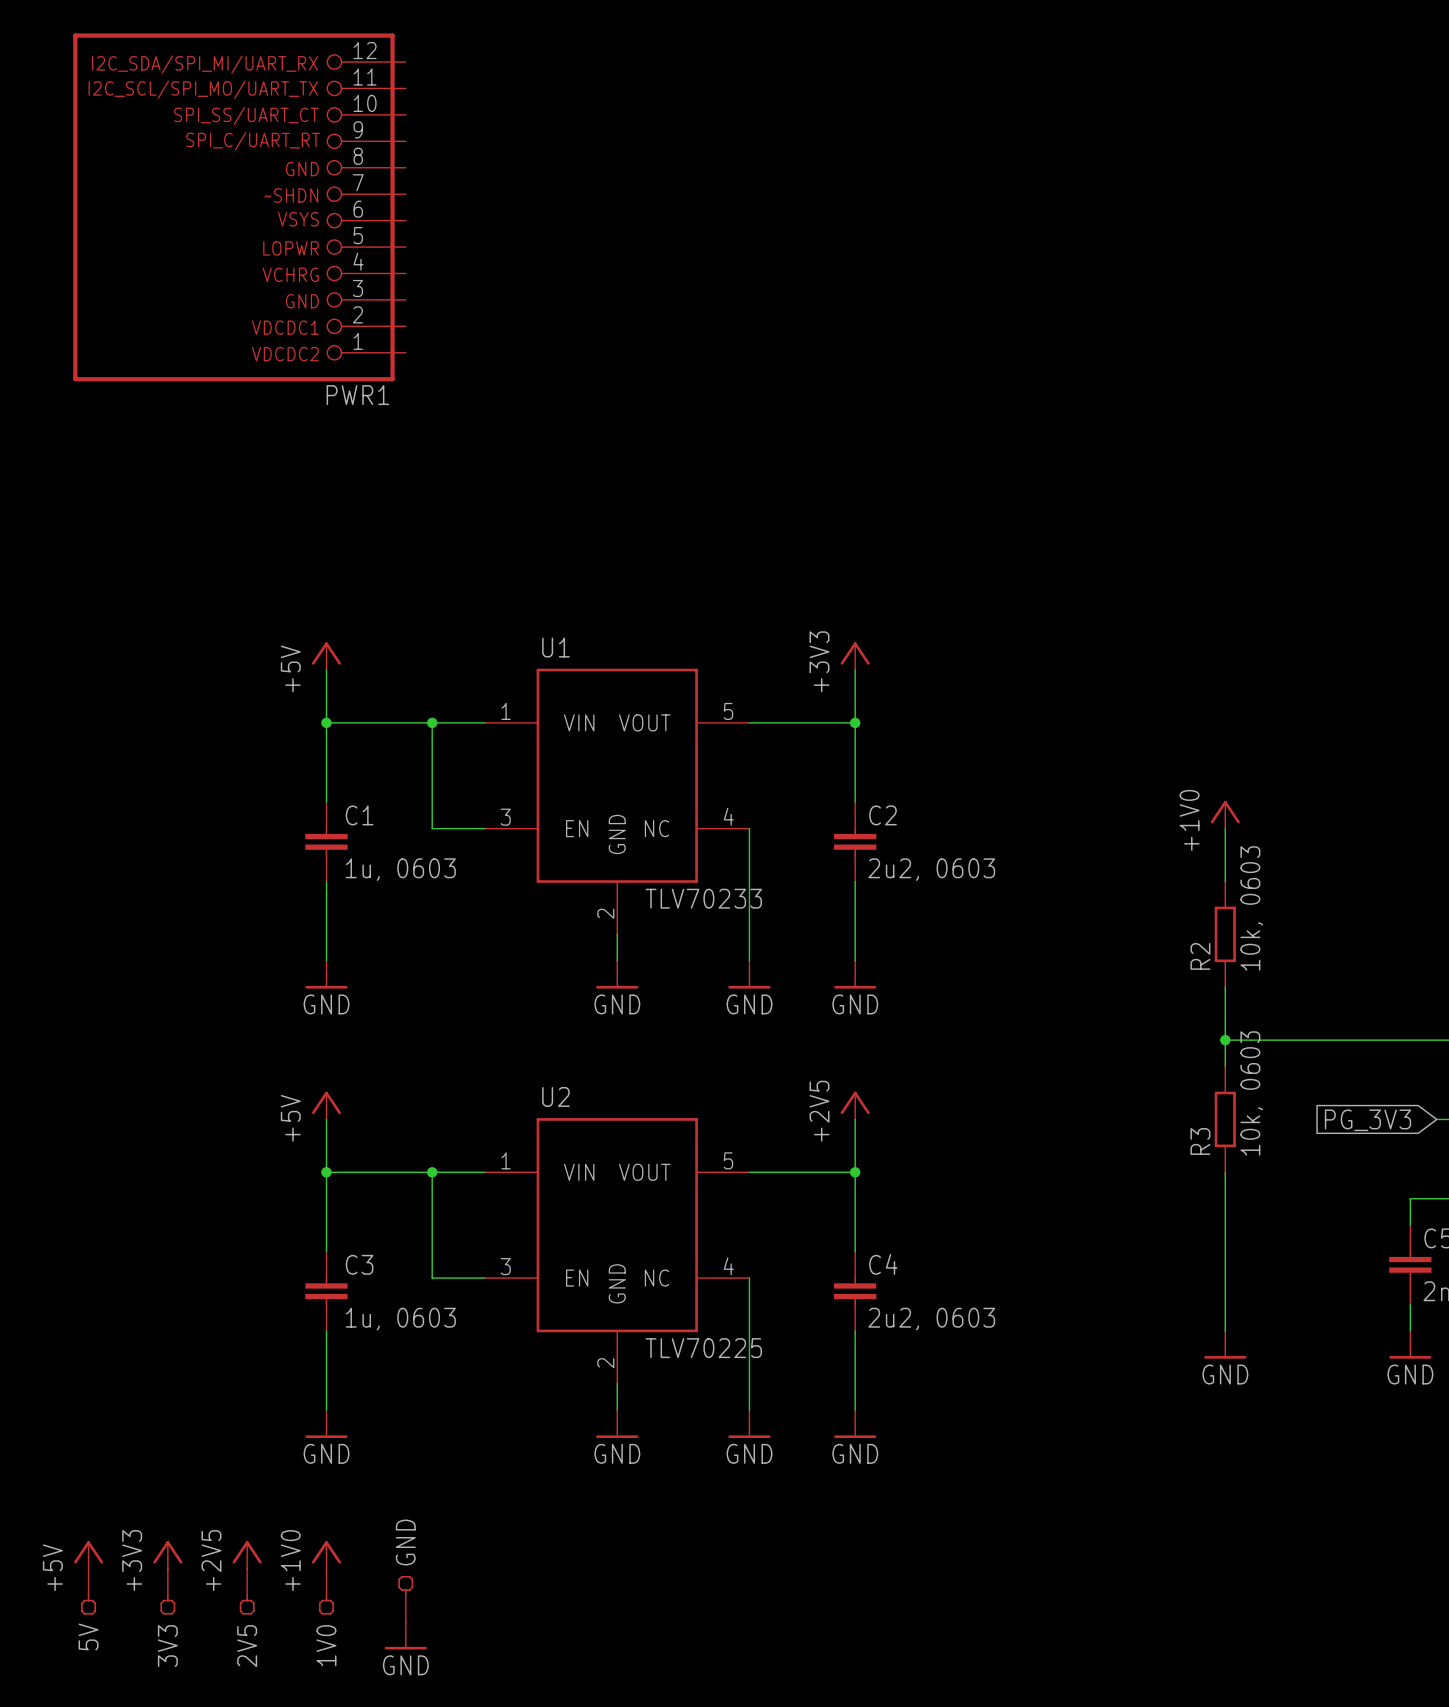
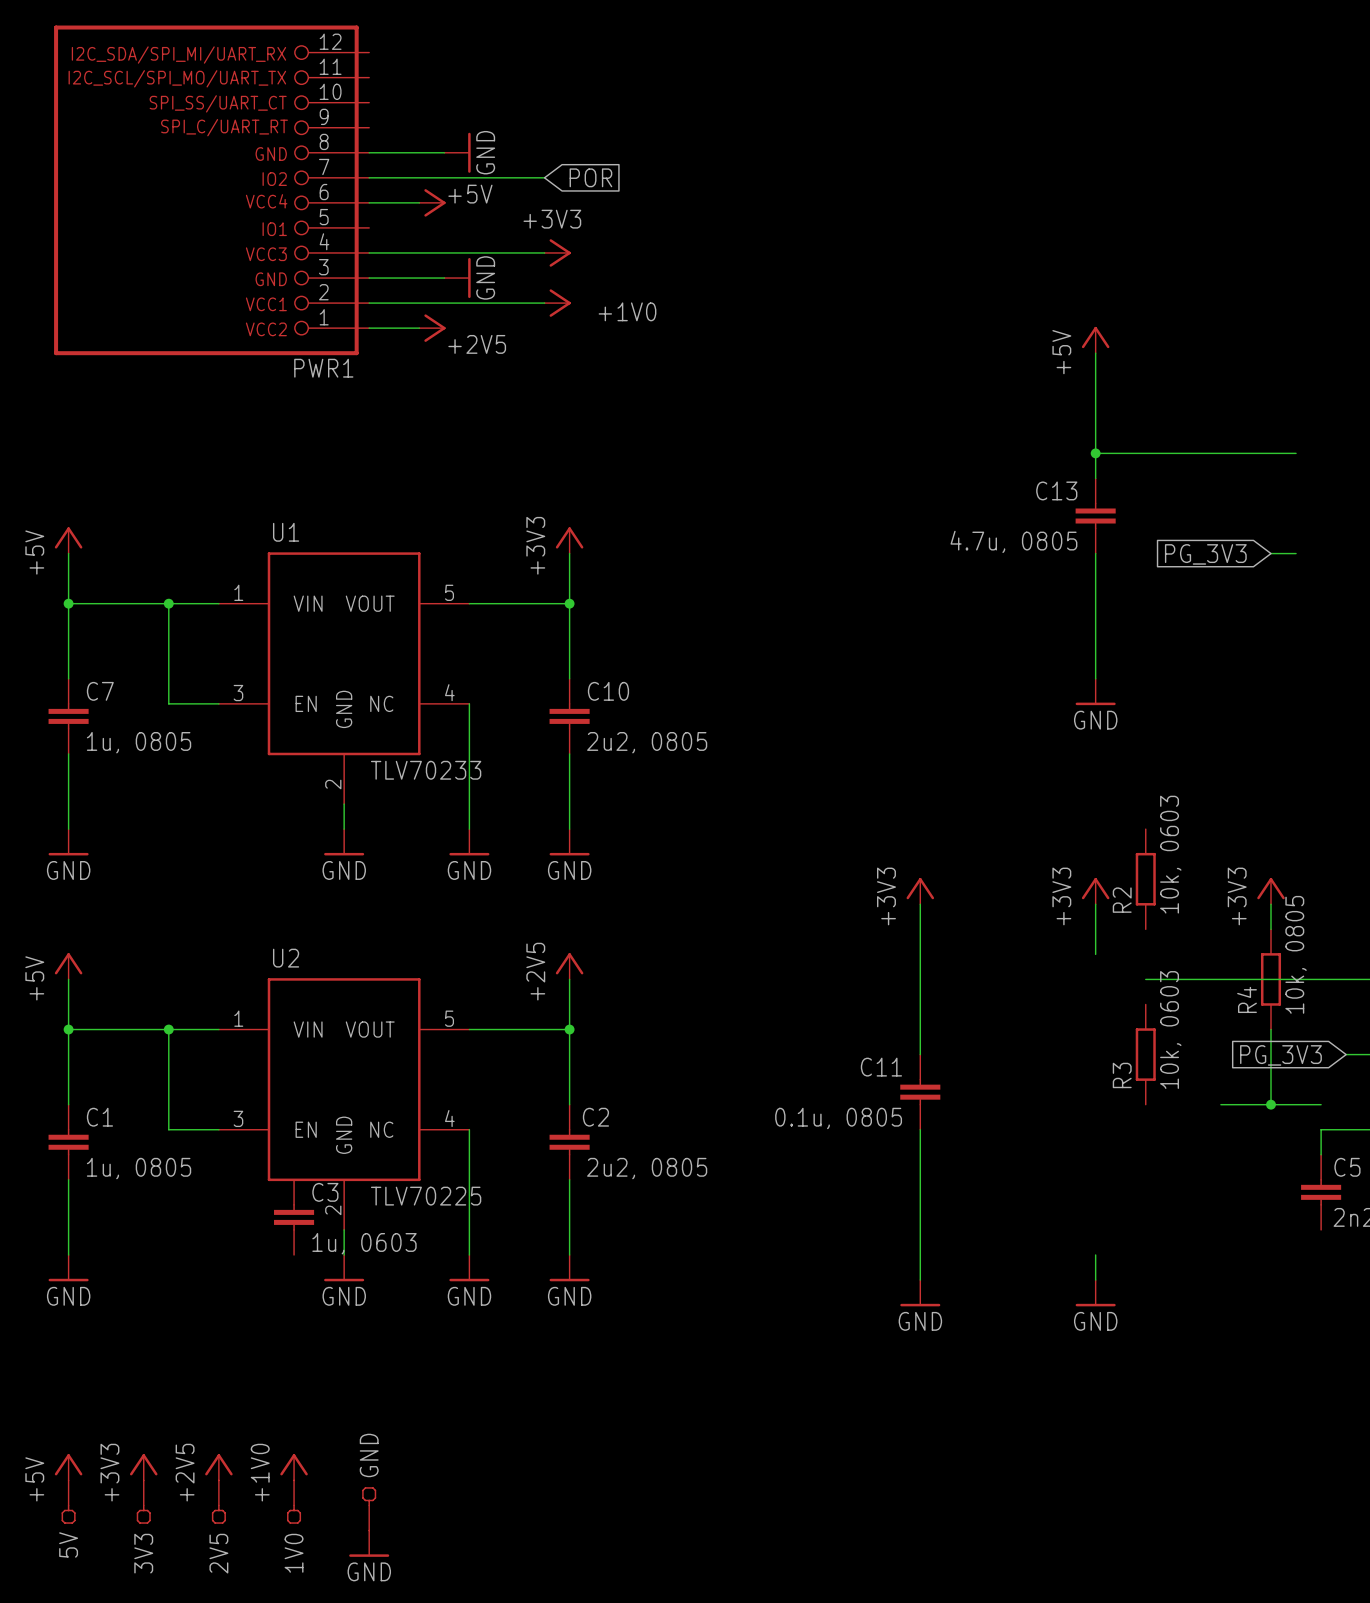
wire: none -> (369, 152) (444, 152)
power symbol: none -> GND (457, 152)
wire: none -> (369, 177) (544, 177)
global label: none -> POR (590, 177)
PWR1 text: ~SHDN (291, 195) -> IO2 (274, 179)
PWR1 text: VSYS (298, 219) -> VCC4 (266, 201)
wire: none -> (369, 202) (419, 202)
power symbol: none -> +5V (432, 202)
PWR1 text: LOPWR (291, 248) -> IO1 (274, 229)
wire: none -> (369, 252) (544, 252)
power symbol: none -> +3V3 (557, 252)
PWR1 text: VCHRG (290, 274) -> VCC3 (266, 254)
wire: none -> (369, 278) (444, 278)
power symbol: none -> GND (457, 278)
wire: none -> (369, 303) (544, 303)
power symbol: none -> +1V0 (557, 303)
PWR1 text: VDCDC1 (285, 327) -> VCC1 (266, 304)
wire: none -> (369, 328) (419, 328)
power symbol: none -> +2V5 (432, 328)
PWR1 text: VDCDC2 (285, 354) -> VCC2 (266, 329)
power symbol: none -> +5V (1095, 340)
wire: none -> (1095, 353) (1095, 478)
wire: none -> (1095, 453) (1296, 453)
junction: none -> (1095, 453)
C13: none -> 4.7u, 0805 (1095, 516)
power symbol: none -> +5V (68, 540)
power symbol: none -> +3V3 (569, 540)
wire: none -> (1095, 553) (1095, 678)
wire: none -> (1271, 553) (1296, 553)
global label: none -> PG_3V3 (1205, 554)
junction: none -> (68, 603)
junction: none -> (168, 603)
junction: none -> (569, 603)
power symbol: +5V (326, 656) -> none
power symbol: +3V3 (855, 656) -> none
wire: (326, 670) (326, 802) -> (68, 553) (68, 678)
wire: (855, 670) (855, 802) -> (569, 553) (569, 678)
wire: (326, 722) (485, 722) -> (68, 603) (218, 603)
junction: (326, 722) -> none
wire: (432, 722) (432, 828) (485, 828) -> (168, 603) (168, 703) (218, 703)
junction: (432, 722) -> none
wire: (749, 722) (855, 722) -> (469, 603) (569, 603)
junction: (855, 722) -> none
power symbol: none -> GND (1095, 691)
C7: none -> 1u, 0805 (68, 716)
C10: none -> 2u2, 0805 (569, 716)
U1 position: (617, 801) -> (344, 678)
power symbol: +1V0 (1225, 814) -> none
wire: (749, 828) (749, 960) -> (469, 703) (469, 829)
wire: (1225, 828) (1225, 881) -> (1095, 904) (1095, 954)
C1 position: (326, 841) -> (68, 1142)
C2 position: (855, 841) -> (569, 1142)
C1 value: 1u, 0603 (400, 869) -> 1u, 0805 (139, 1168)
C2 value: 2u2, 0603 (931, 869) -> 2u2, 0805 (647, 1168)
wire: (326, 881) (326, 960) -> (68, 753) (68, 829)
wire: (855, 881) (855, 960) -> (569, 753) (569, 829)
power symbol: none -> GND (68, 842)
power symbol: none -> GND (469, 842)
power symbol: none -> GND (569, 842)
wire: (617, 934) (617, 960) -> (344, 804) (344, 829)
power symbol: none -> +3V3 (920, 891)
power symbol: none -> +3V3 (1095, 891)
power symbol: none -> +3V3 (1271, 891)
wire: none -> (920, 904) (920, 1054)
wire: none -> (1271, 904) (1271, 929)
power symbol position: GND (326, 974) -> GND (344, 842)
power symbol: GND (617, 974) -> none
power symbol: GND (749, 974) -> none
power symbol: GND (855, 974) -> none
wire: (1225, 987) (1225, 1066) -> (1271, 1029) (1271, 1104)
power symbol: none -> +5V (68, 966)
junction: (1225, 1040) -> none
R4: none -> 10k, 0805 (1271, 979)
junction: none -> (68, 1029)
junction: none -> (168, 1029)
junction: none -> (569, 1029)
power symbol: +5V (326, 1105) -> none
power symbol position: +2V5 (855, 1105) -> +2V5 (569, 966)
wire: (326, 1119) (326, 1251) -> (68, 979) (68, 1104)
wire: (855, 1119) (855, 1251) -> (569, 979) (569, 1104)
C11: none -> 0.1u, 0805 (920, 1092)
wire: (326, 1172) (485, 1172) -> (68, 1029) (218, 1029)
junction: (326, 1172) -> none
wire: (432, 1172) (432, 1278) (485, 1278) -> (168, 1029) (168, 1129) (218, 1129)
junction: (432, 1172) -> none
wire: (749, 1172) (855, 1172) -> (469, 1029) (569, 1029)
junction: (855, 1172) -> none
wire: (1225, 1172) (1225, 1330) -> (920, 1129) (920, 1280)
wire: none -> (1220, 1104) (1321, 1104)
junction: none -> (1271, 1104)
U2 position: (617, 1250) -> (344, 1104)
wire: (749, 1278) (749, 1410) -> (469, 1129) (469, 1254)
C4: 2u2, 0603 (855, 1291) -> none
wire: (1410, 1304) (1410, 1330) -> (1095, 1254) (1095, 1280)
wire: (326, 1330) (326, 1410) -> (68, 1179) (68, 1254)
wire: (855, 1330) (855, 1410) -> (569, 1179) (569, 1254)
power symbol: none -> GND (68, 1268)
power symbol: none -> GND (469, 1268)
power symbol: none -> GND (569, 1268)
power symbol position: GND (1225, 1344) -> GND (1095, 1293)
power symbol: GND (1410, 1344) -> none
power symbol: none -> GND (920, 1293)
wire: (617, 1383) (617, 1410) -> (344, 1229) (344, 1254)
power symbol position: GND (326, 1424) -> GND (344, 1268)
power symbol: GND (617, 1424) -> none
power symbol: GND (749, 1424) -> none
power symbol: GND (855, 1424) -> none

